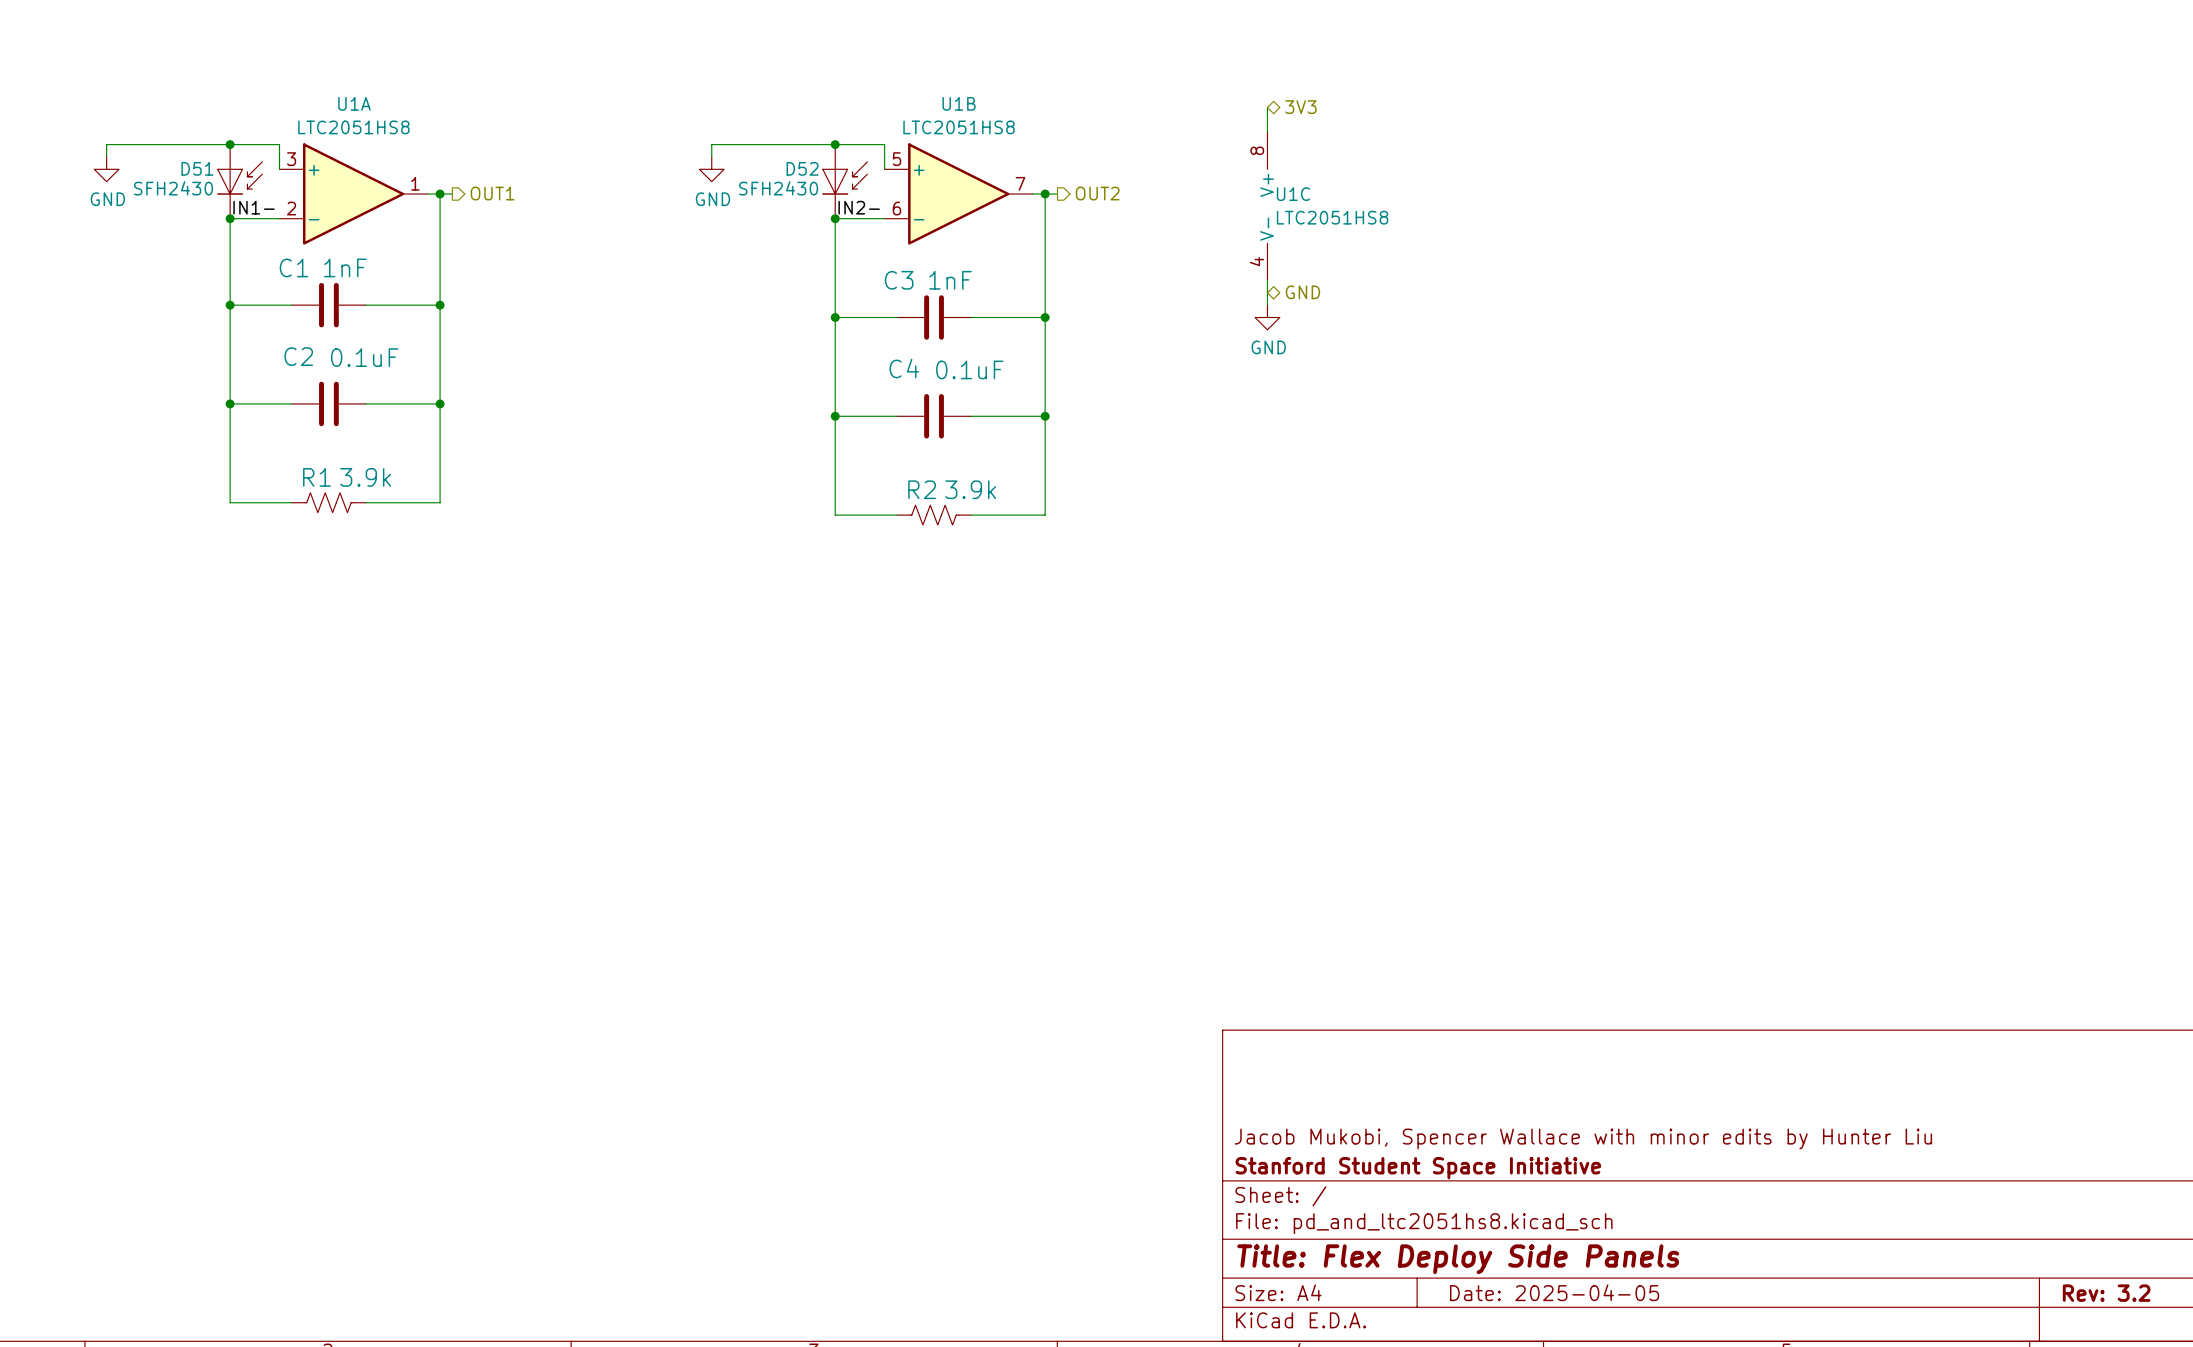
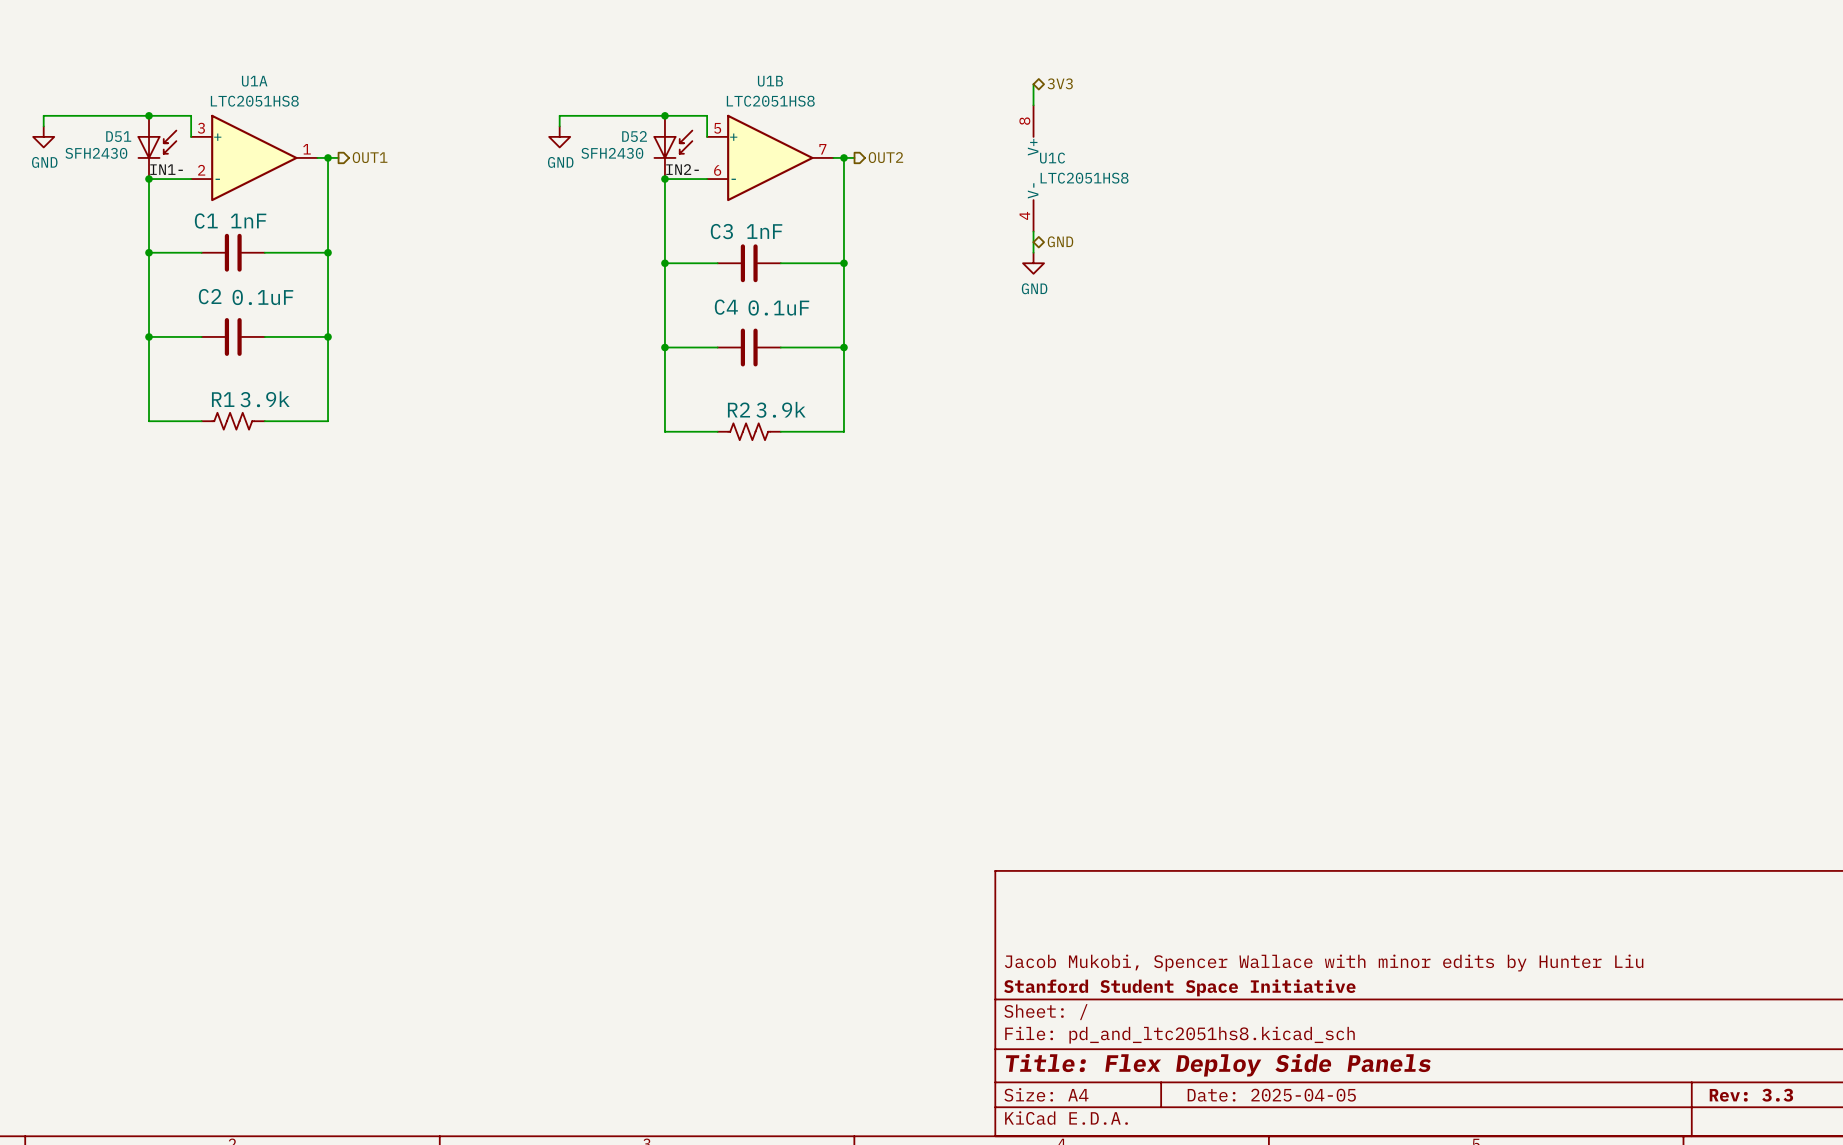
title block: Rev: 3.2 (2106, 1293) -> Rev: 3.3 (1751, 1095)

